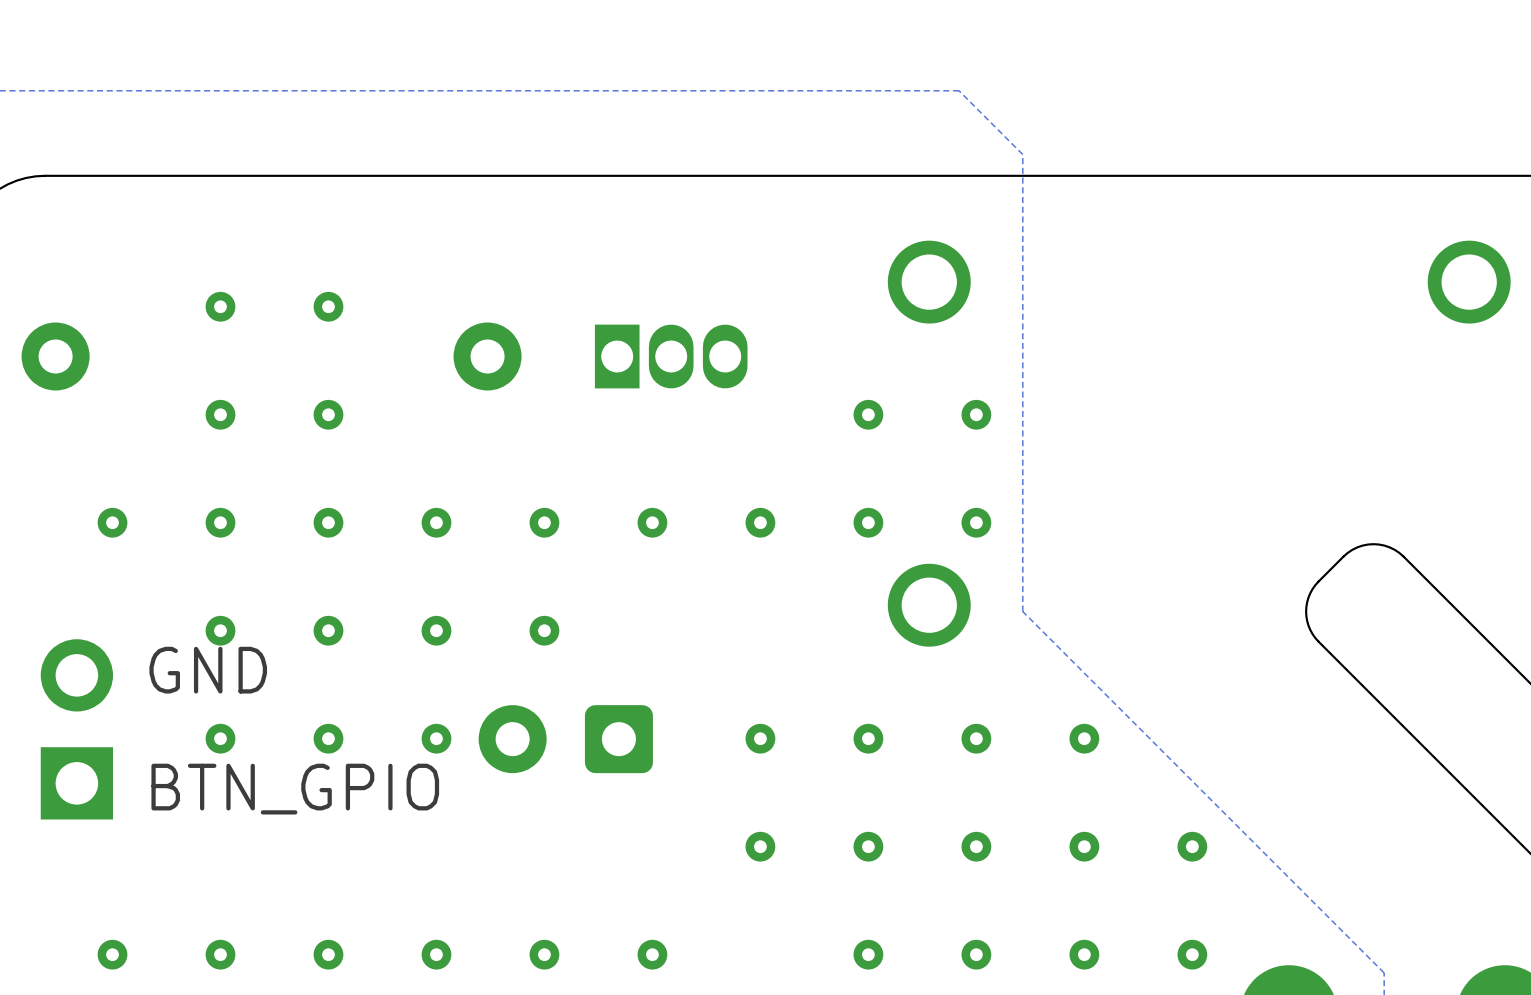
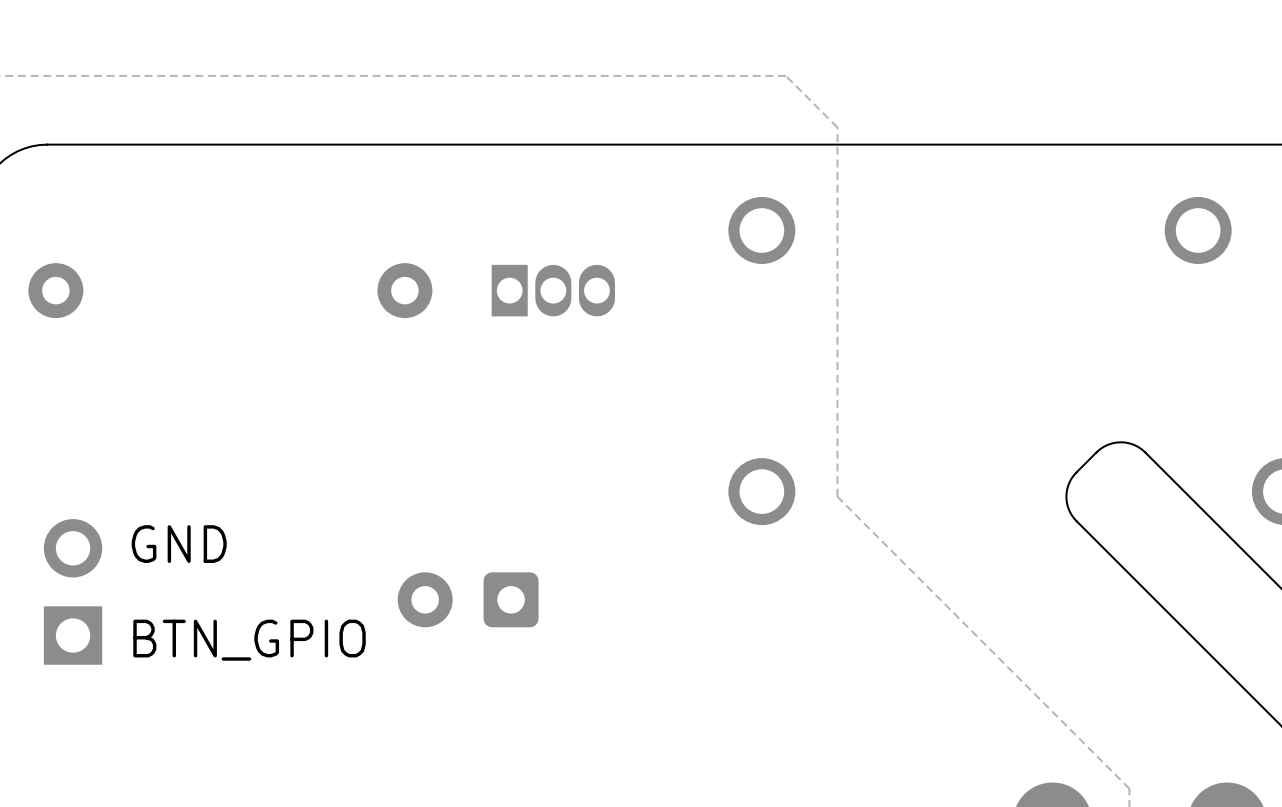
via: (220, 306) -> none
via: (328, 306) -> none
via: (220, 414) -> none
via: (328, 414) -> none
via: (868, 414) -> none
via: (976, 414) -> none
via: (112, 522) -> none
via: (220, 522) -> none
via: (328, 522) -> none
via: (436, 522) -> none
via: (544, 522) -> none
via: (652, 522) -> none
via: (760, 522) -> none
via: (868, 522) -> none
via: (976, 522) -> none
via: (220, 630) -> none
via: (328, 630) -> none
via: (436, 630) -> none
via: (544, 630) -> none
via: (220, 738) -> none
via: (328, 738) -> none
via: (436, 738) -> none
via: (760, 738) -> none
via: (868, 738) -> none
via: (976, 738) -> none
via: (1084, 738) -> none
via: (760, 846) -> none
via: (868, 846) -> none
via: (976, 846) -> none
via: (1084, 846) -> none
via: (1192, 846) -> none
via: (112, 954) -> none
via: (220, 954) -> none
via: (328, 954) -> none
via: (436, 954) -> none
via: (544, 954) -> none
via: (652, 954) -> none
via: (868, 954) -> none
via: (976, 954) -> none
via: (1084, 954) -> none
via: (1192, 954) -> none

